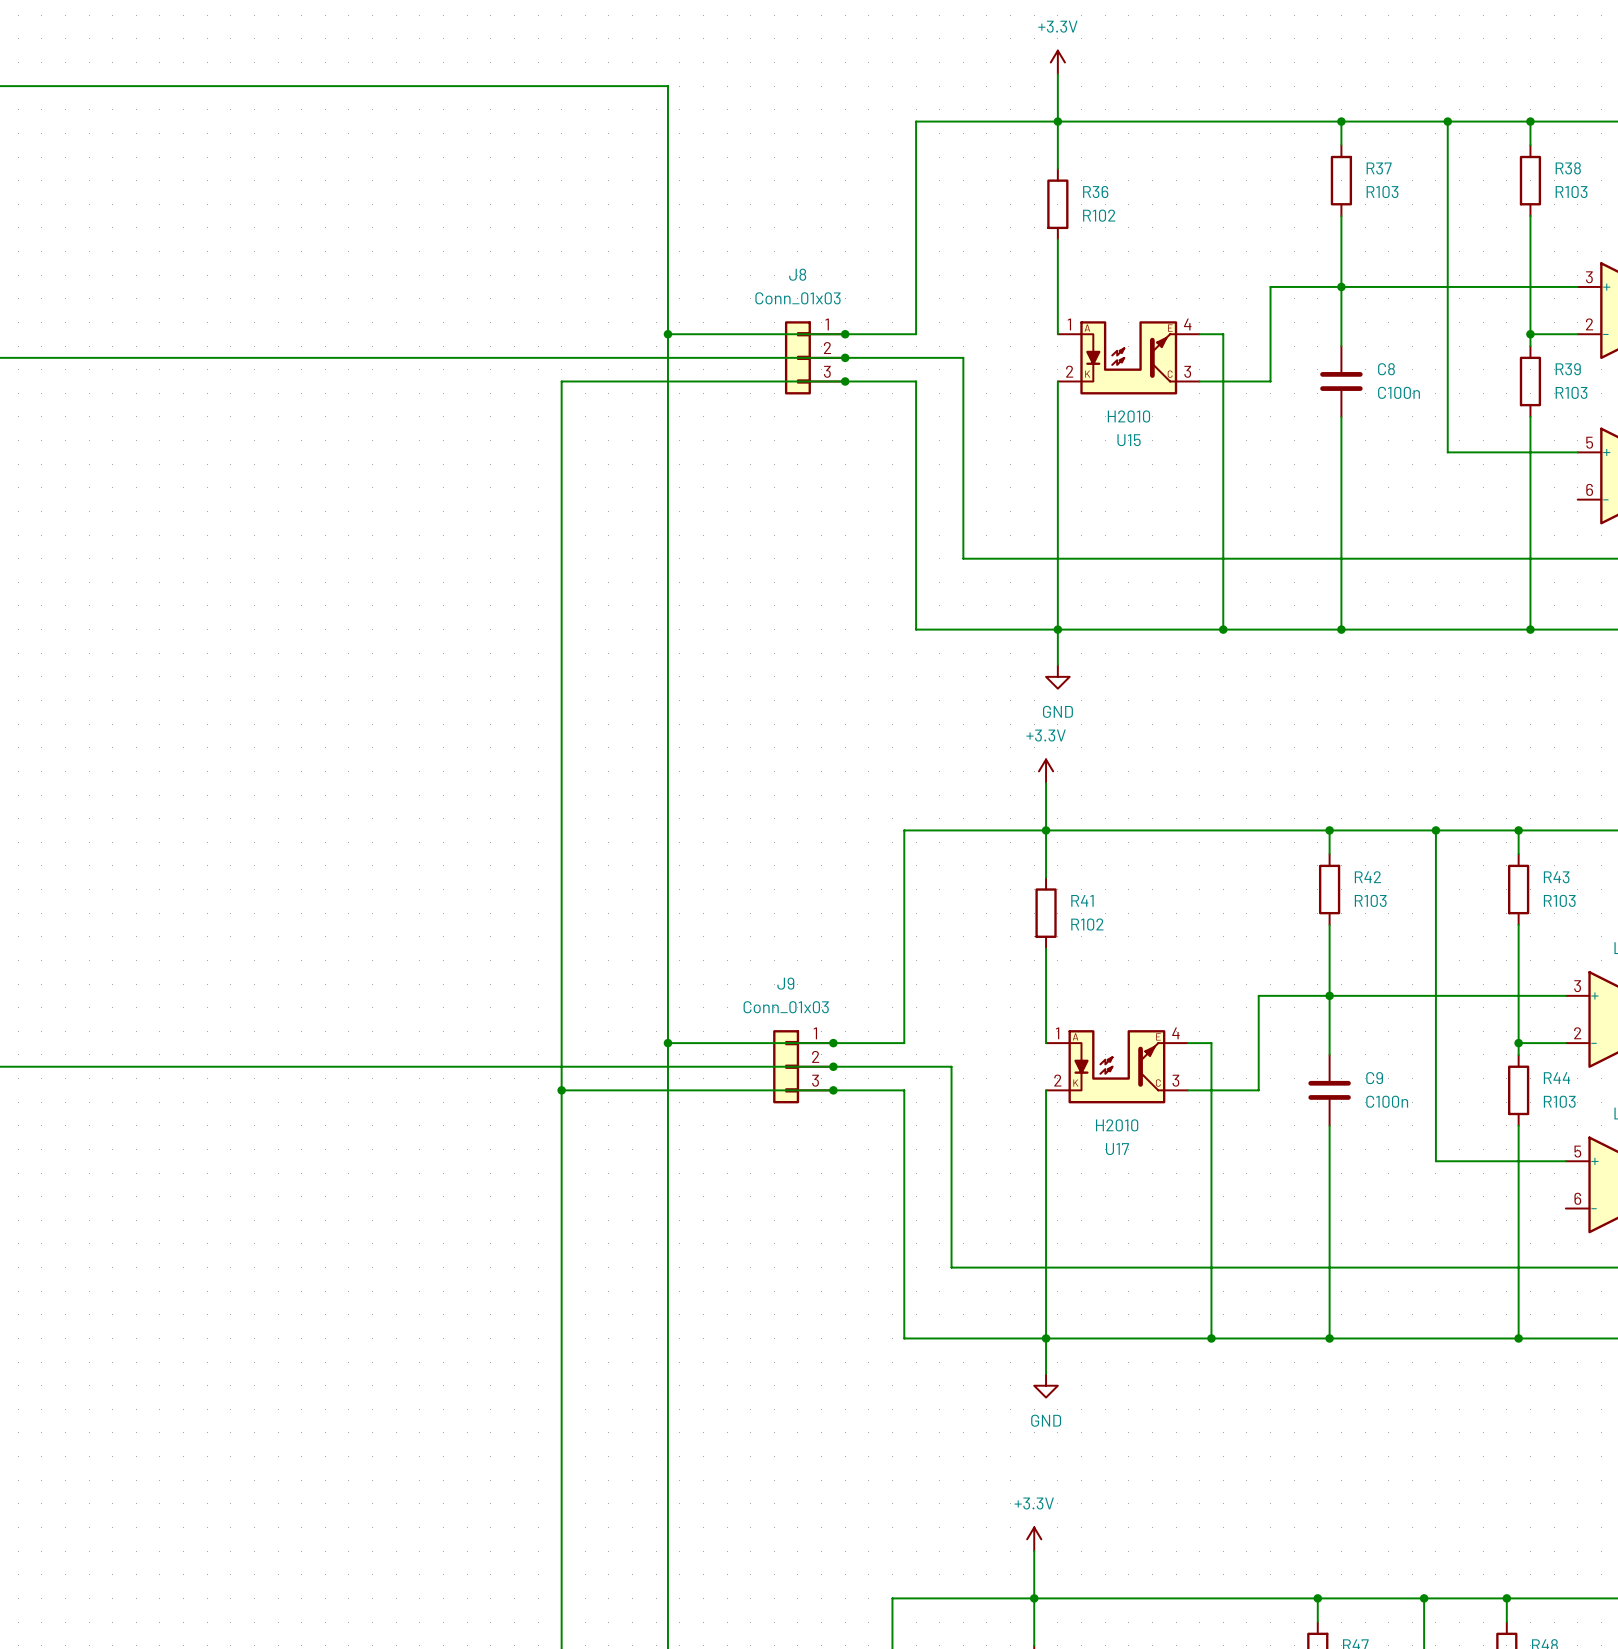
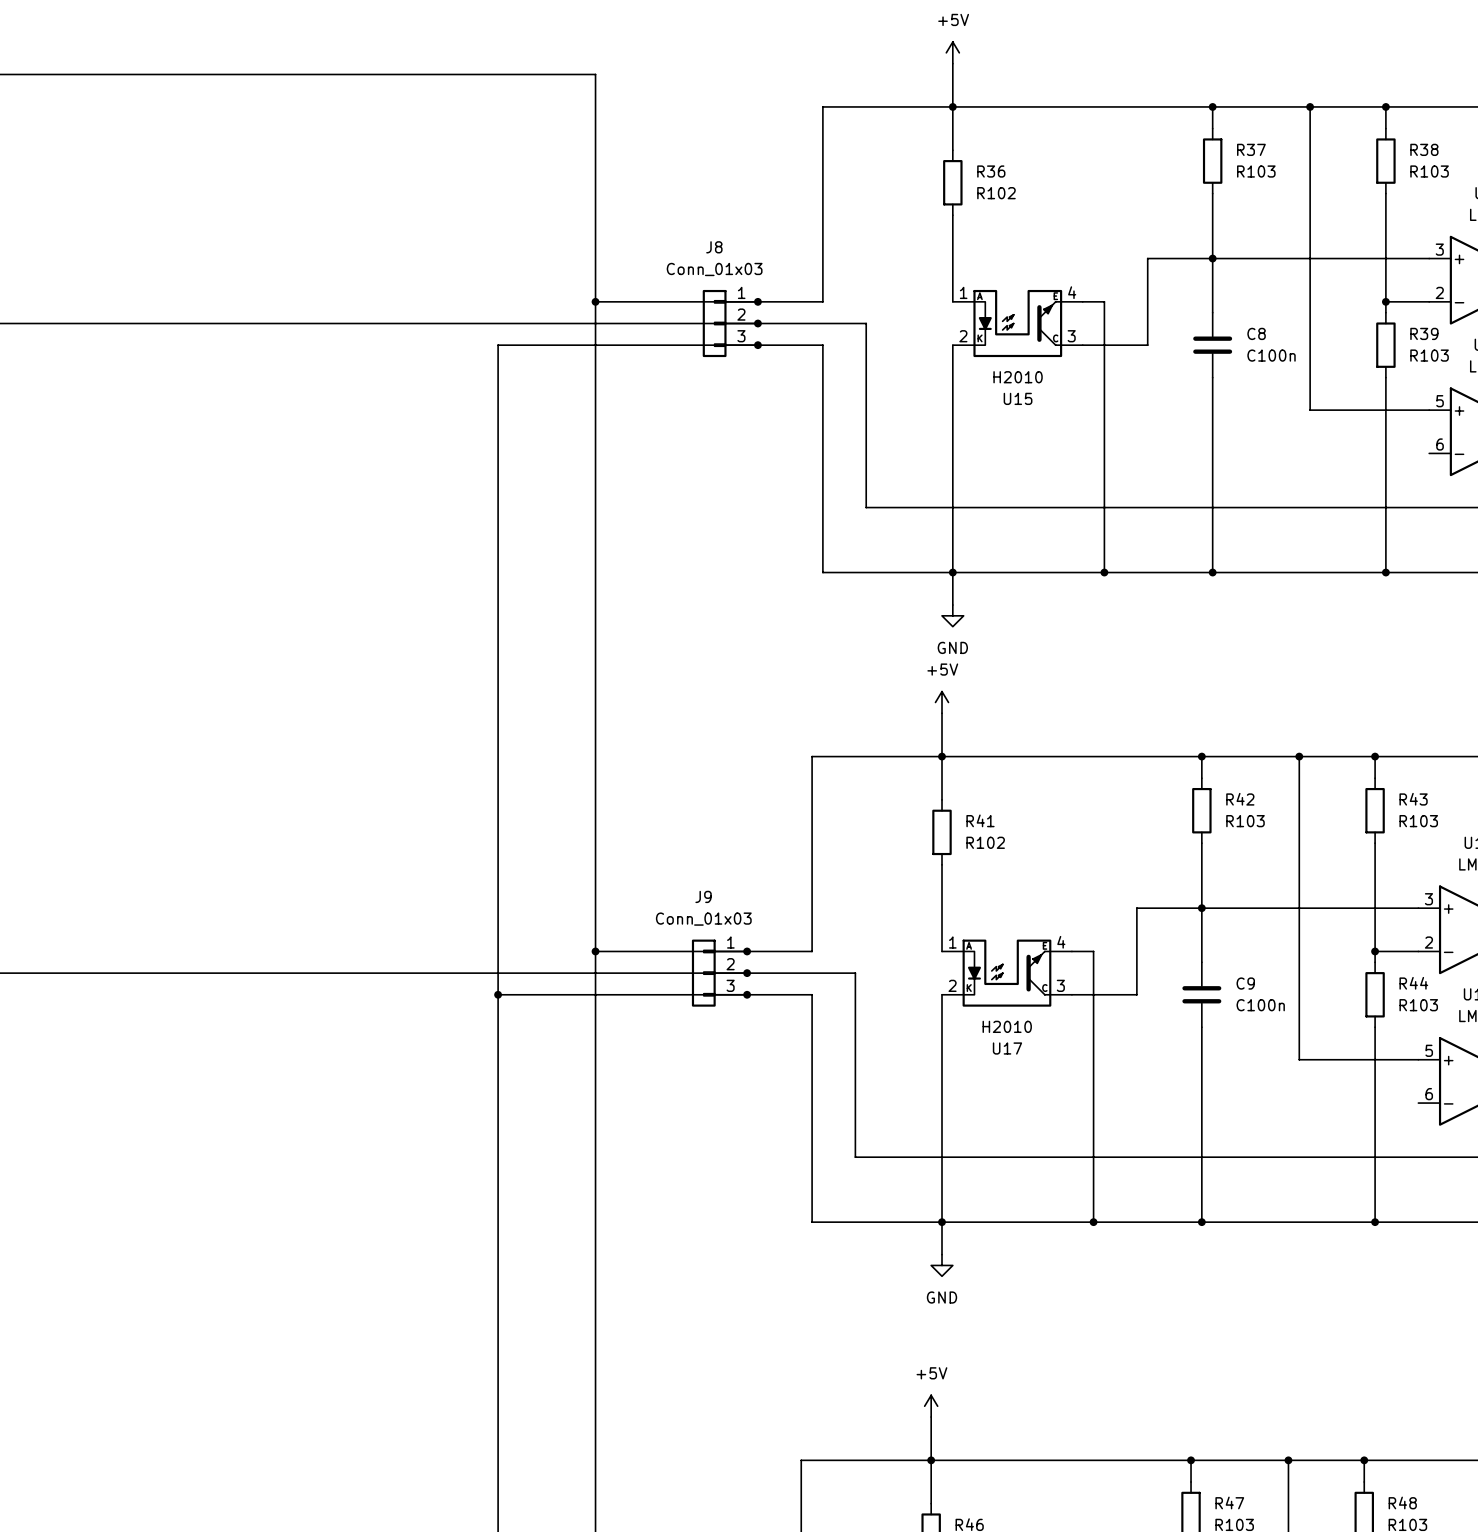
power symbol: +3.3V (1057, 62) -> +5V (952, 52)
power symbol: +3.3V (1046, 771) -> +5V (942, 702)
power symbol: +3.3V (1034, 1539) -> +5V (931, 1406)

